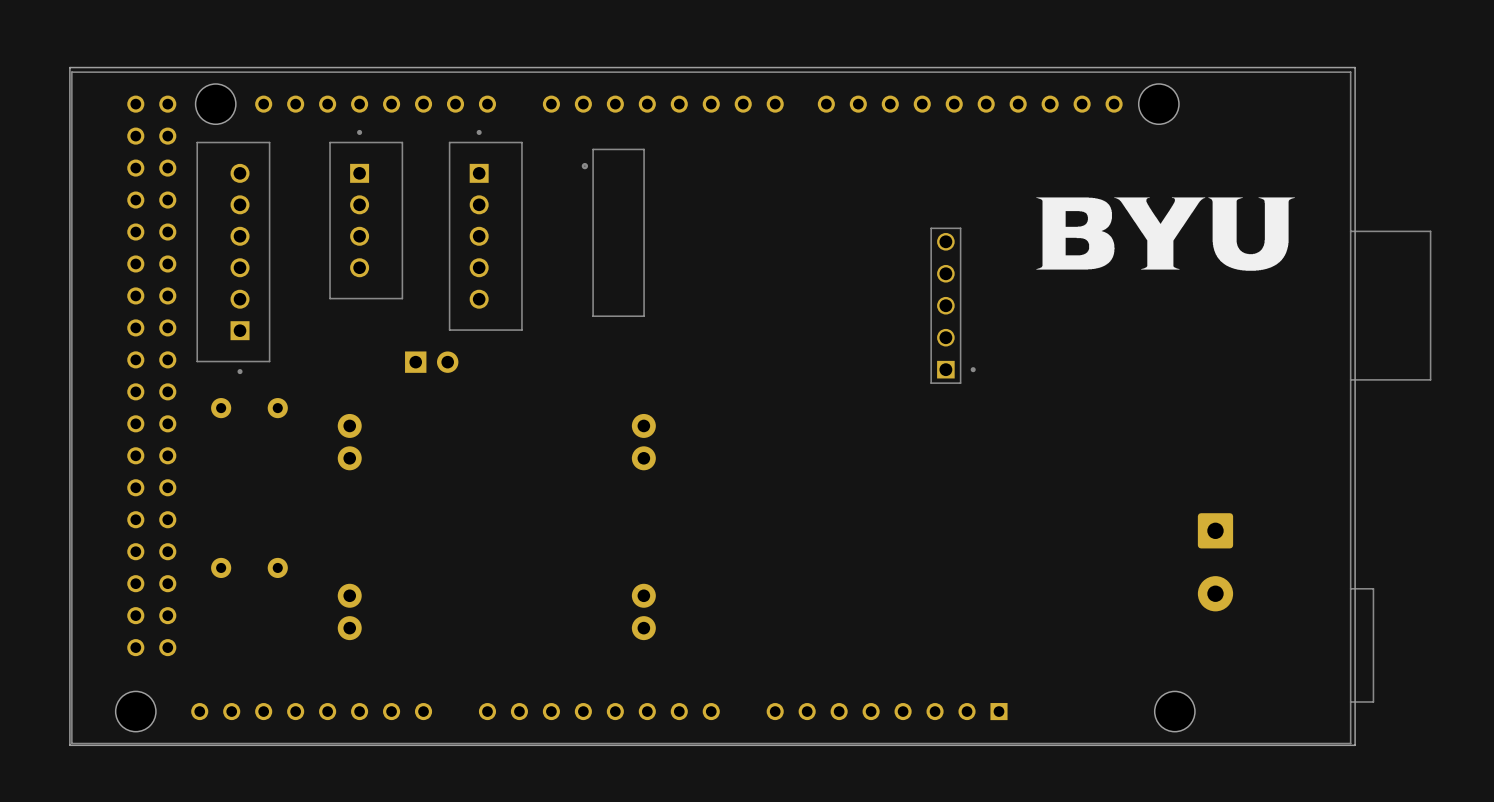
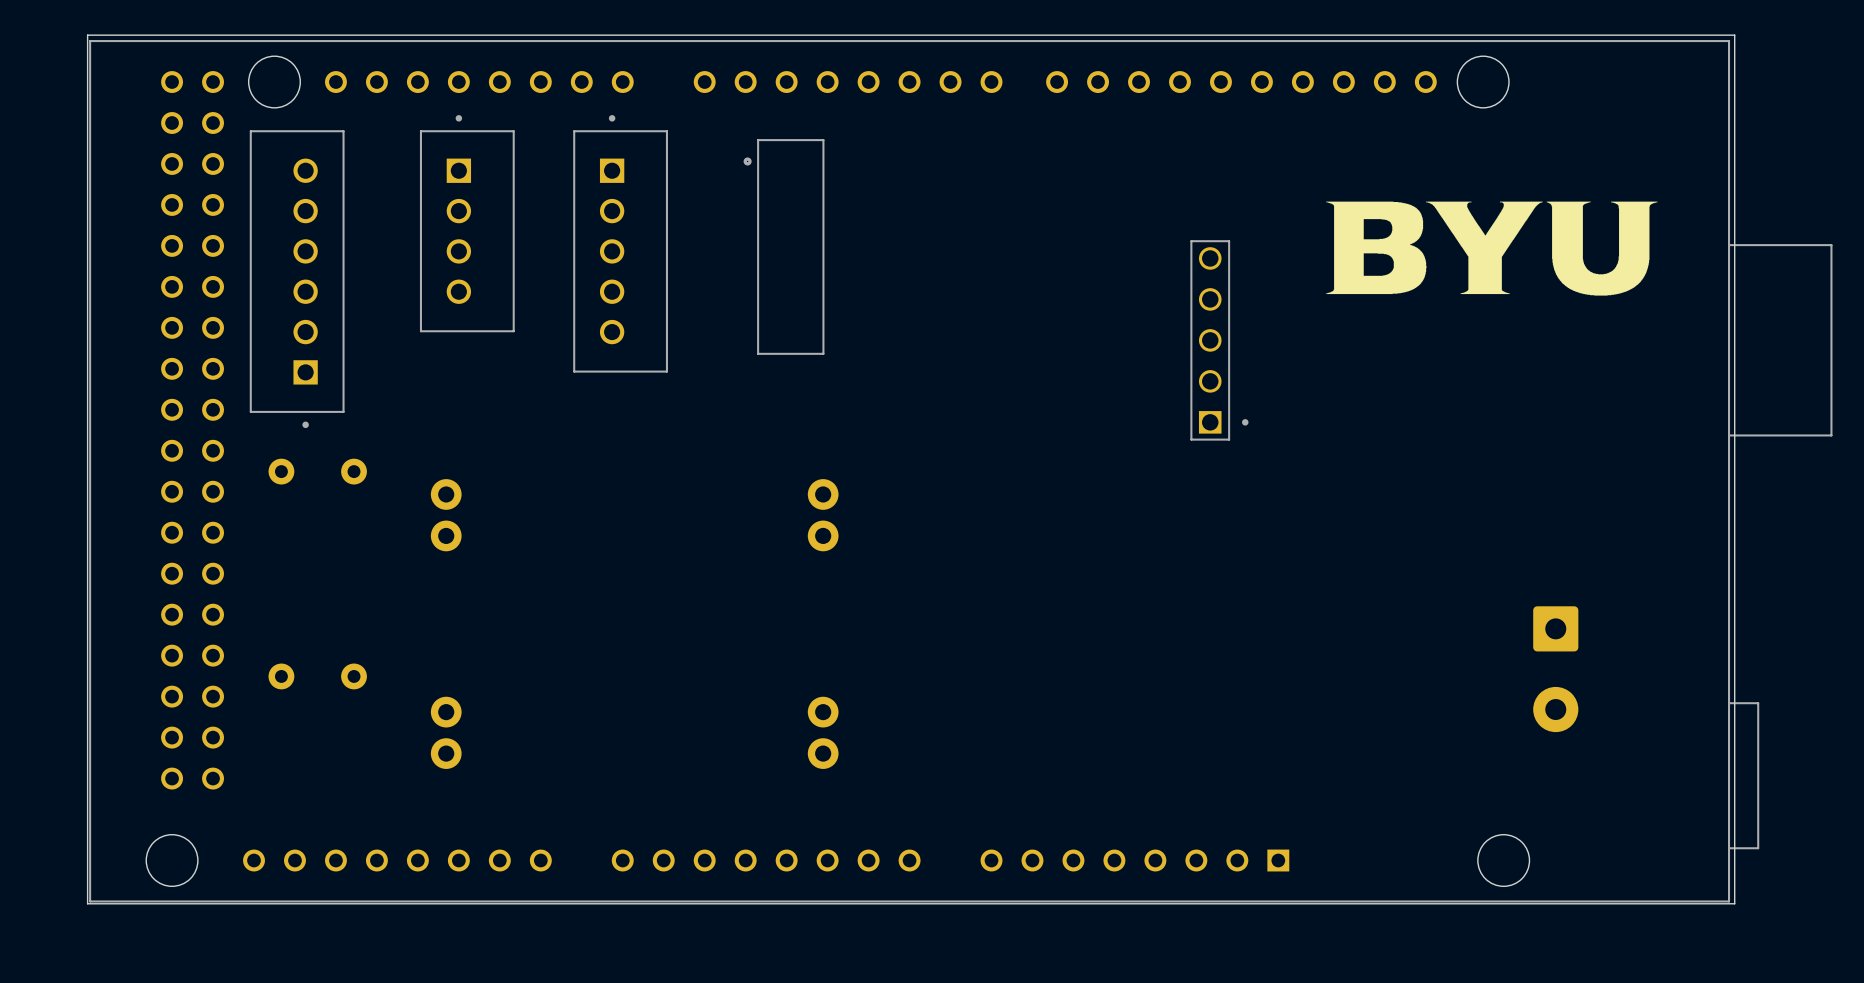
part: (431, 362) -> none

